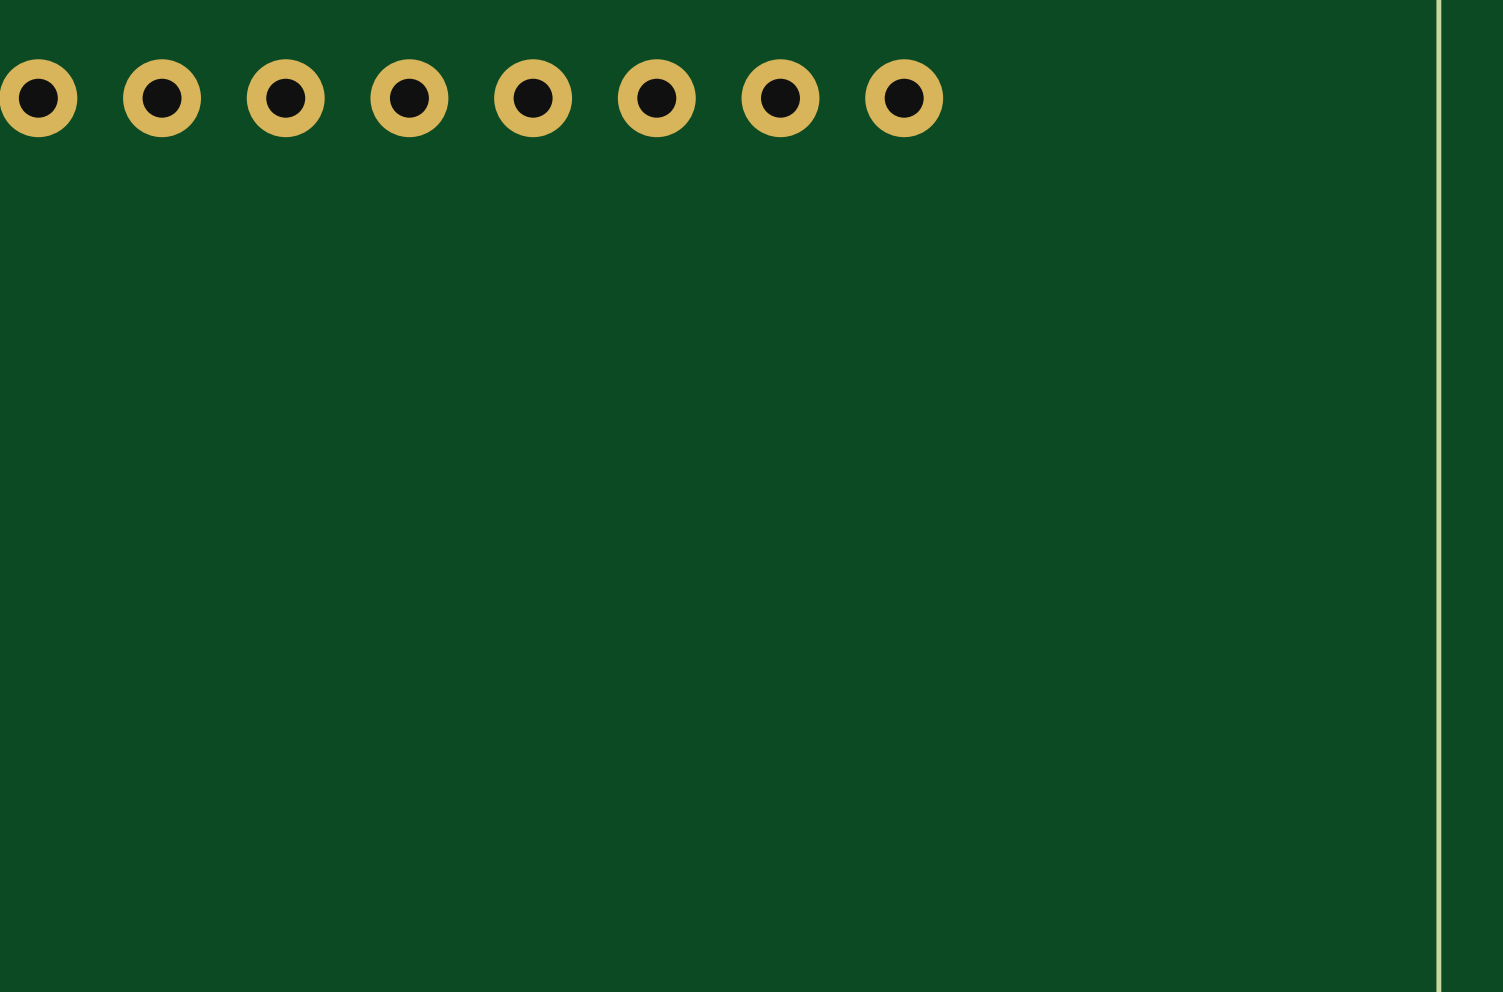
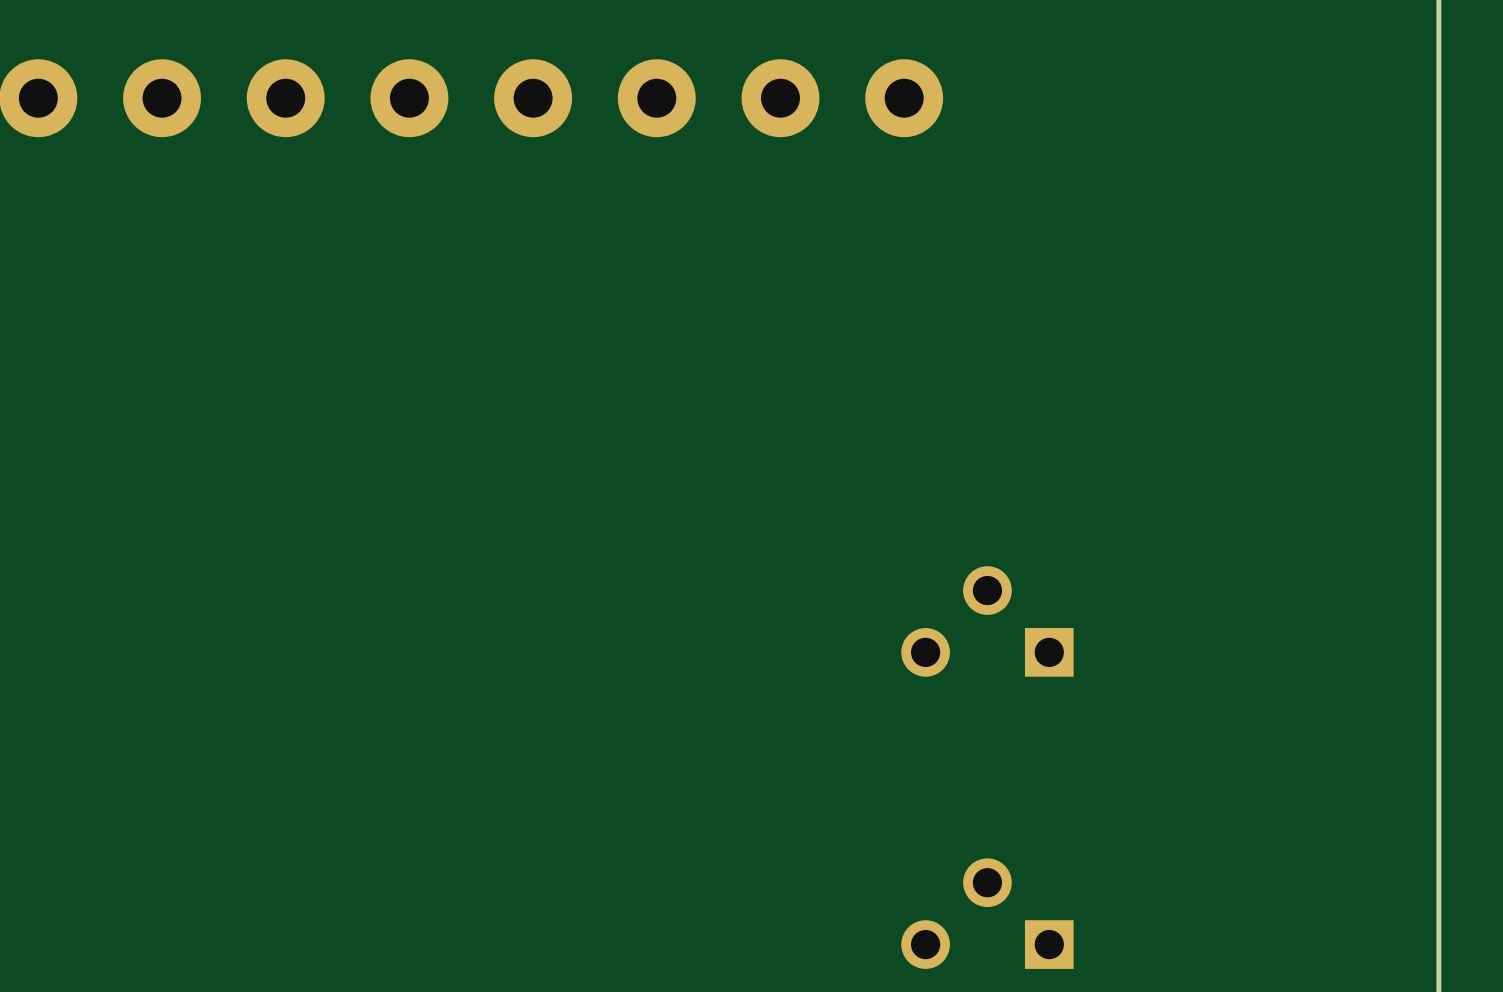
part: none -> (987, 621)
part: none -> (987, 913)

